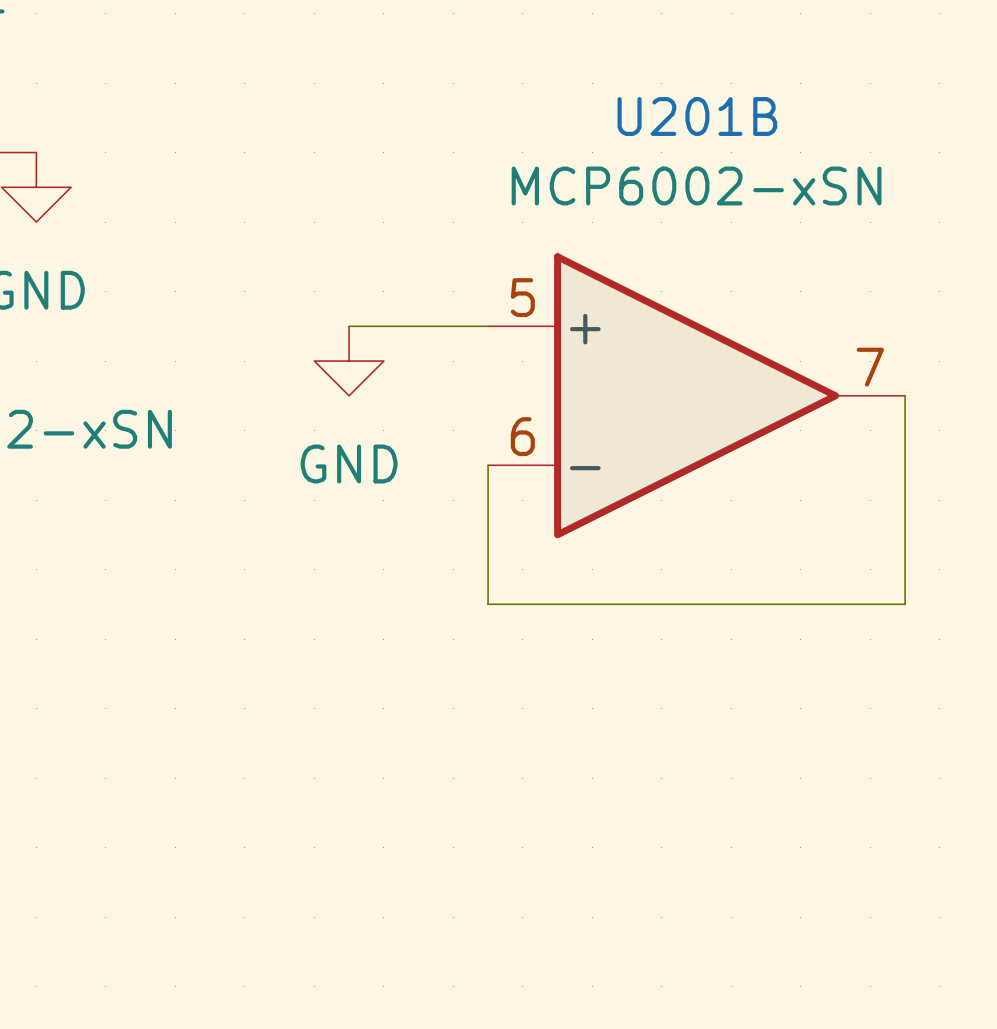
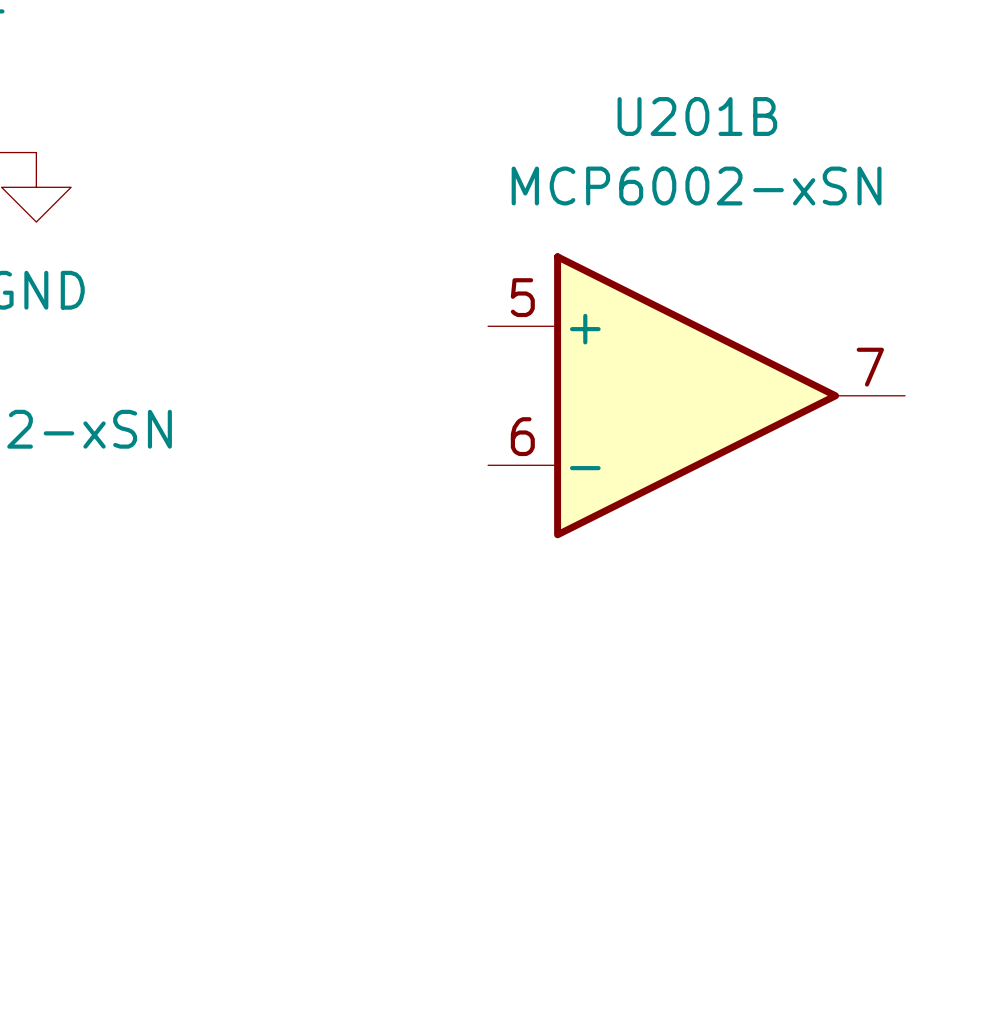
wire: (349, 326) (488, 326) -> none
power symbol: GND (349, 361) -> none
wire: (905, 395) (905, 604) (488, 604) (488, 465) -> none

